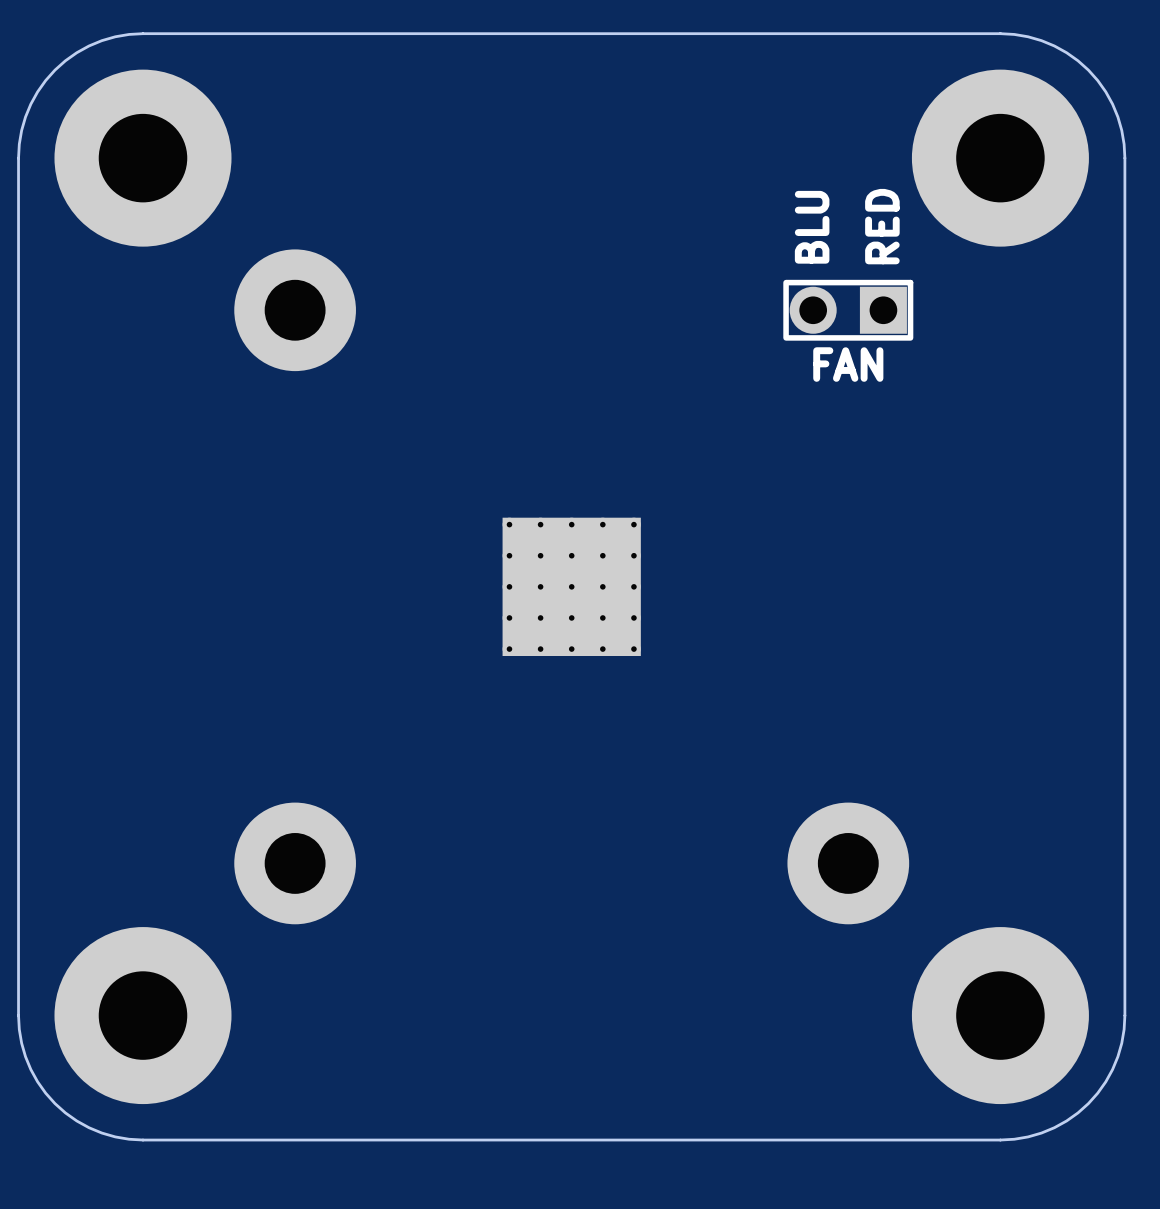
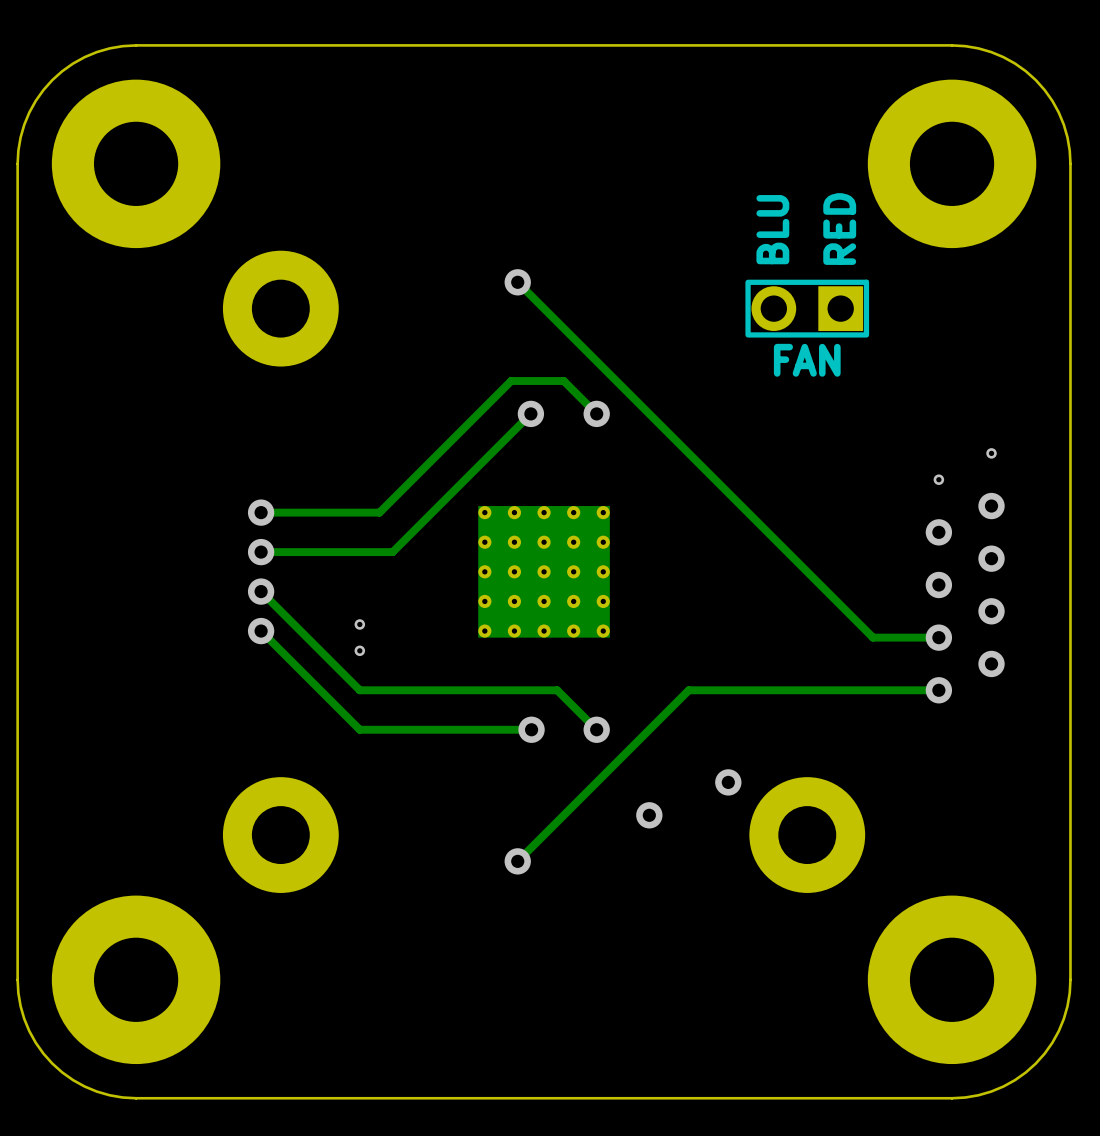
track: none -> (517, 282) (873, 637) (938, 637)
via: none -> (517, 282)
track: none -> (530, 413) (392, 552) (261, 552)
via: none -> (530, 413)
track: none -> (596, 413) (563, 381) (511, 381) (379, 512) (261, 512)
via: none -> (596, 413)
via: none -> (991, 453)
via: none -> (938, 479)
via: none -> (991, 506)
via: none -> (261, 512)
via: none -> (938, 532)
via: none -> (261, 552)
via: none -> (991, 558)
via: none -> (938, 584)
track: none -> (261, 591) (359, 690) (557, 690) (596, 729)
via: none -> (261, 591)
via: none -> (991, 611)
via: none -> (359, 624)
track: none -> (261, 631) (359, 729) (531, 729)
via: none -> (261, 631)
via: none -> (938, 637)
via: none -> (359, 650)
via: none -> (991, 663)
track: none -> (938, 690) (688, 690) (517, 861)
via: none -> (938, 690)
via: none -> (531, 729)
via: none -> (596, 729)
via: none -> (728, 782)
via: none -> (649, 815)
via: none -> (517, 861)

